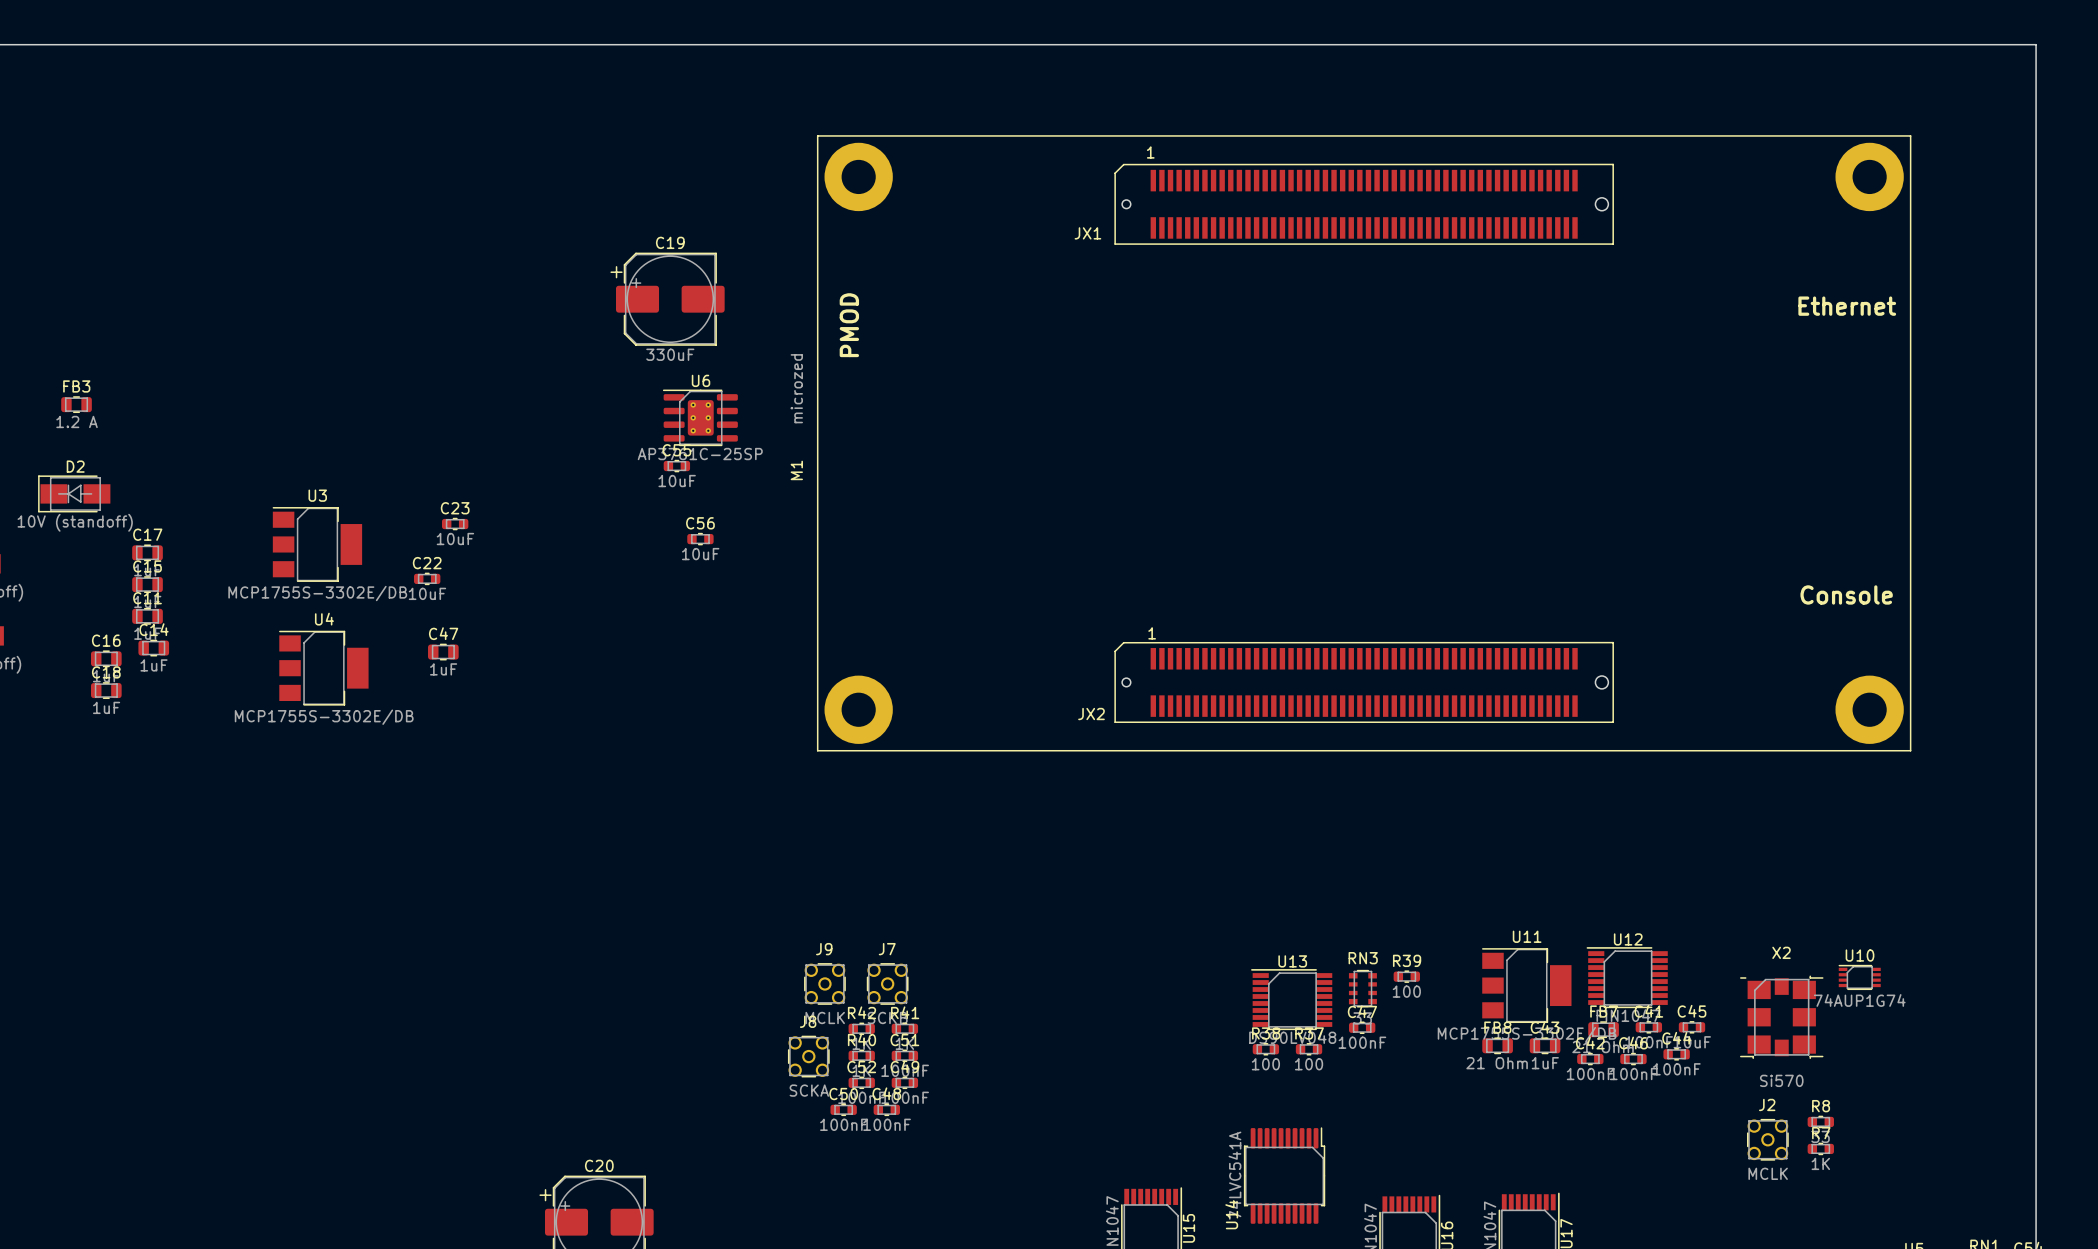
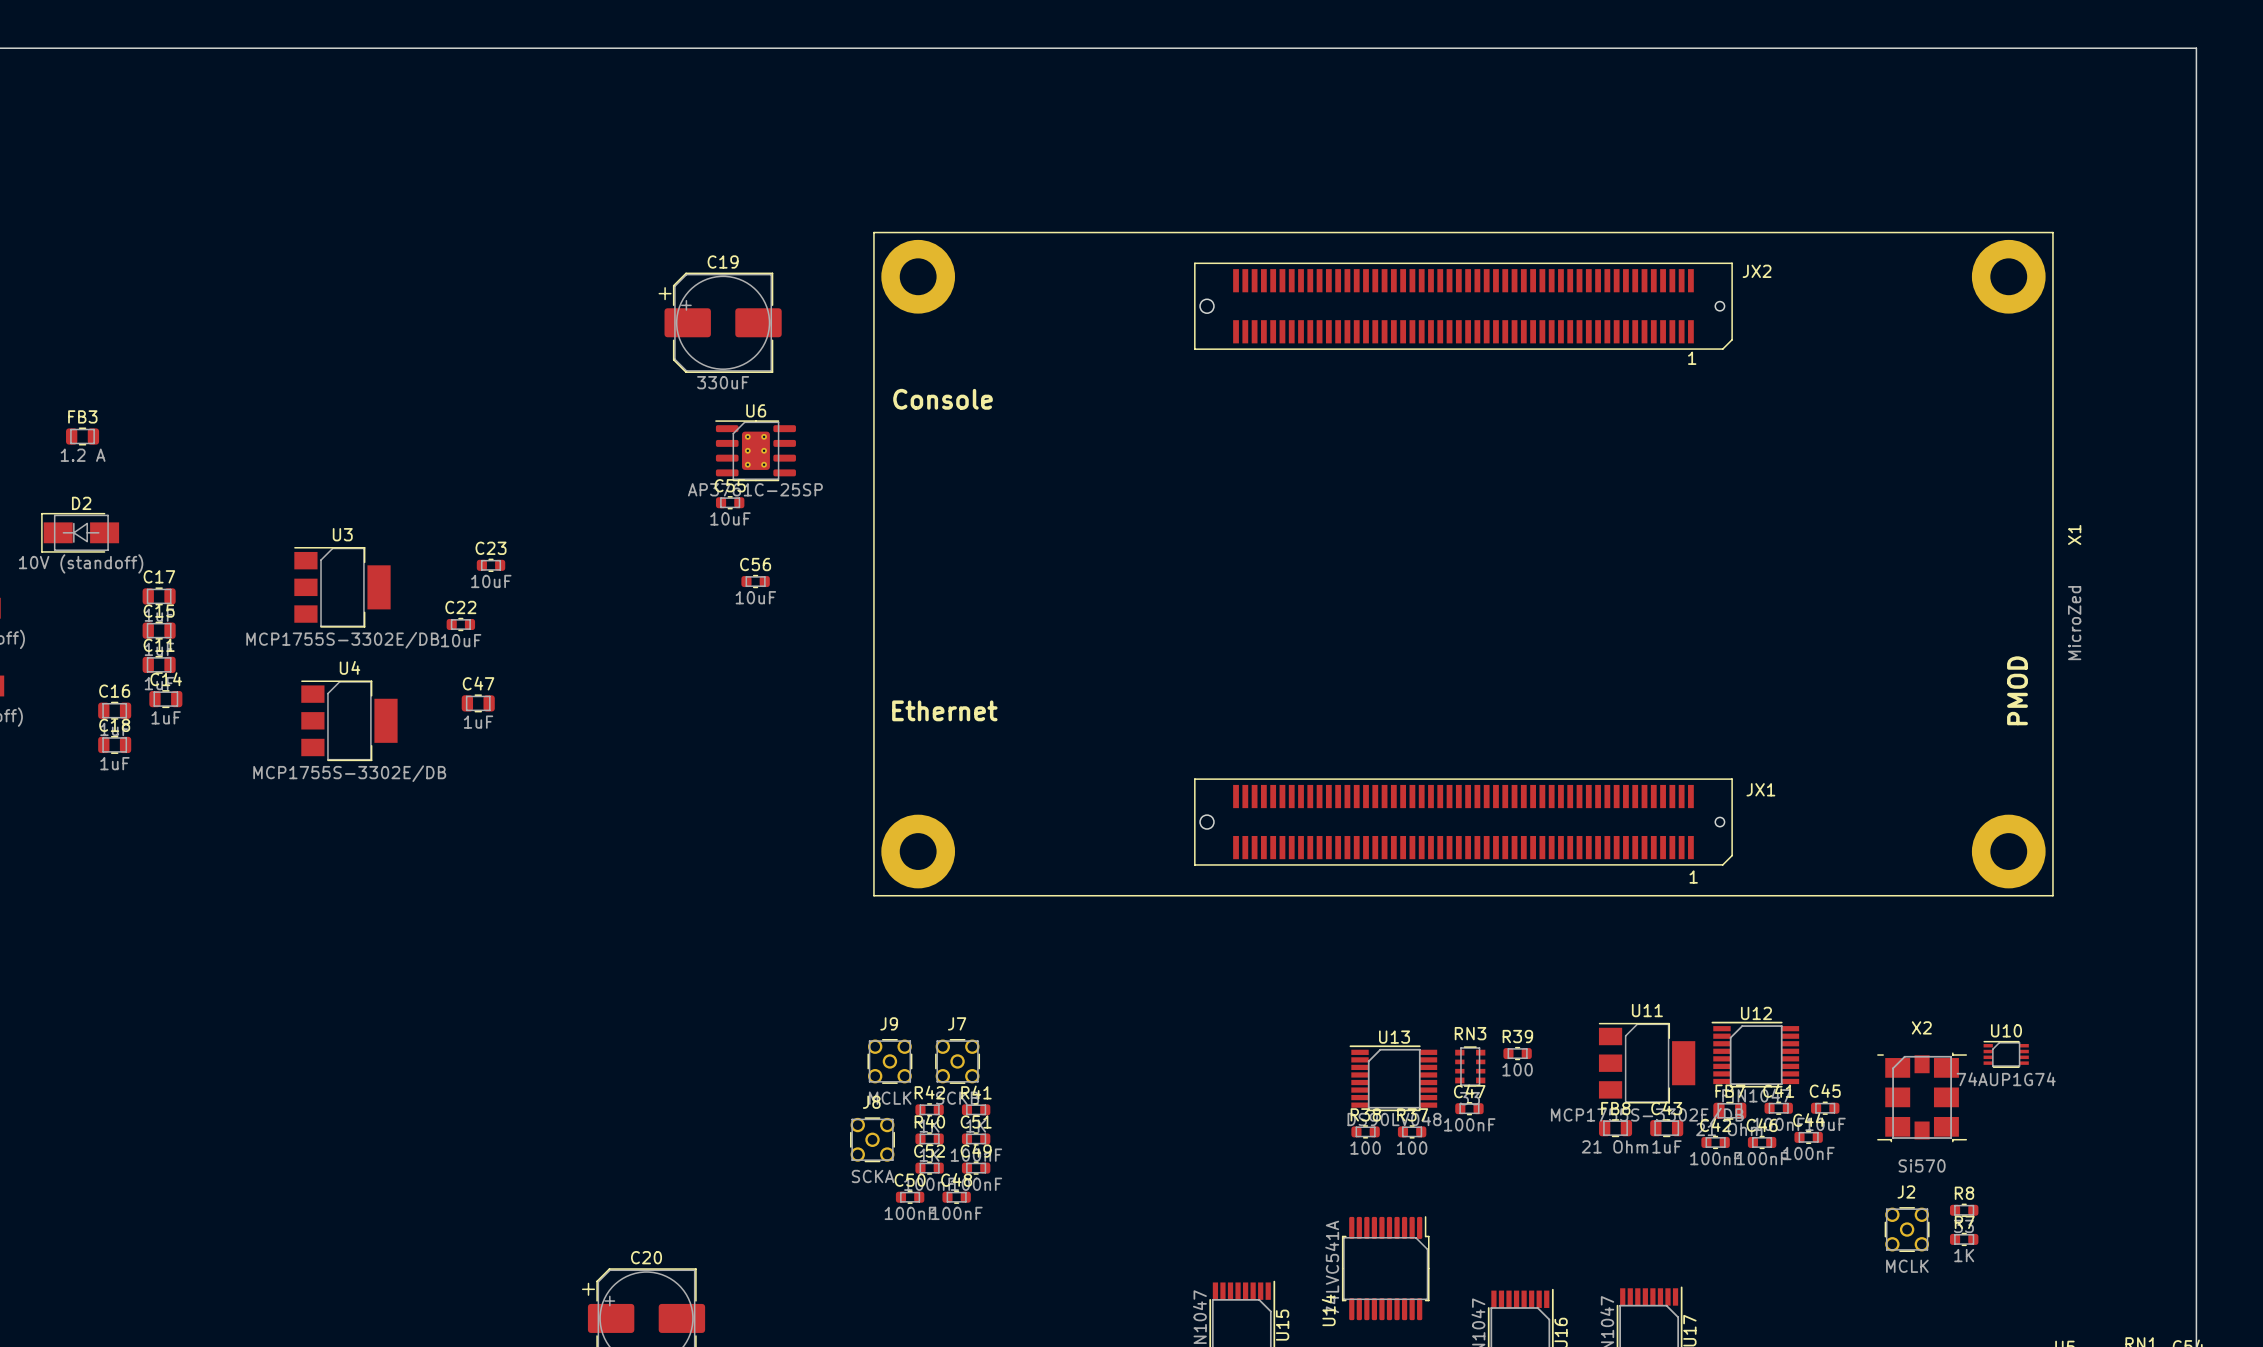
M1: microzed (1364, 443) -> none
X1: none -> MicroZed (1463, 564)

